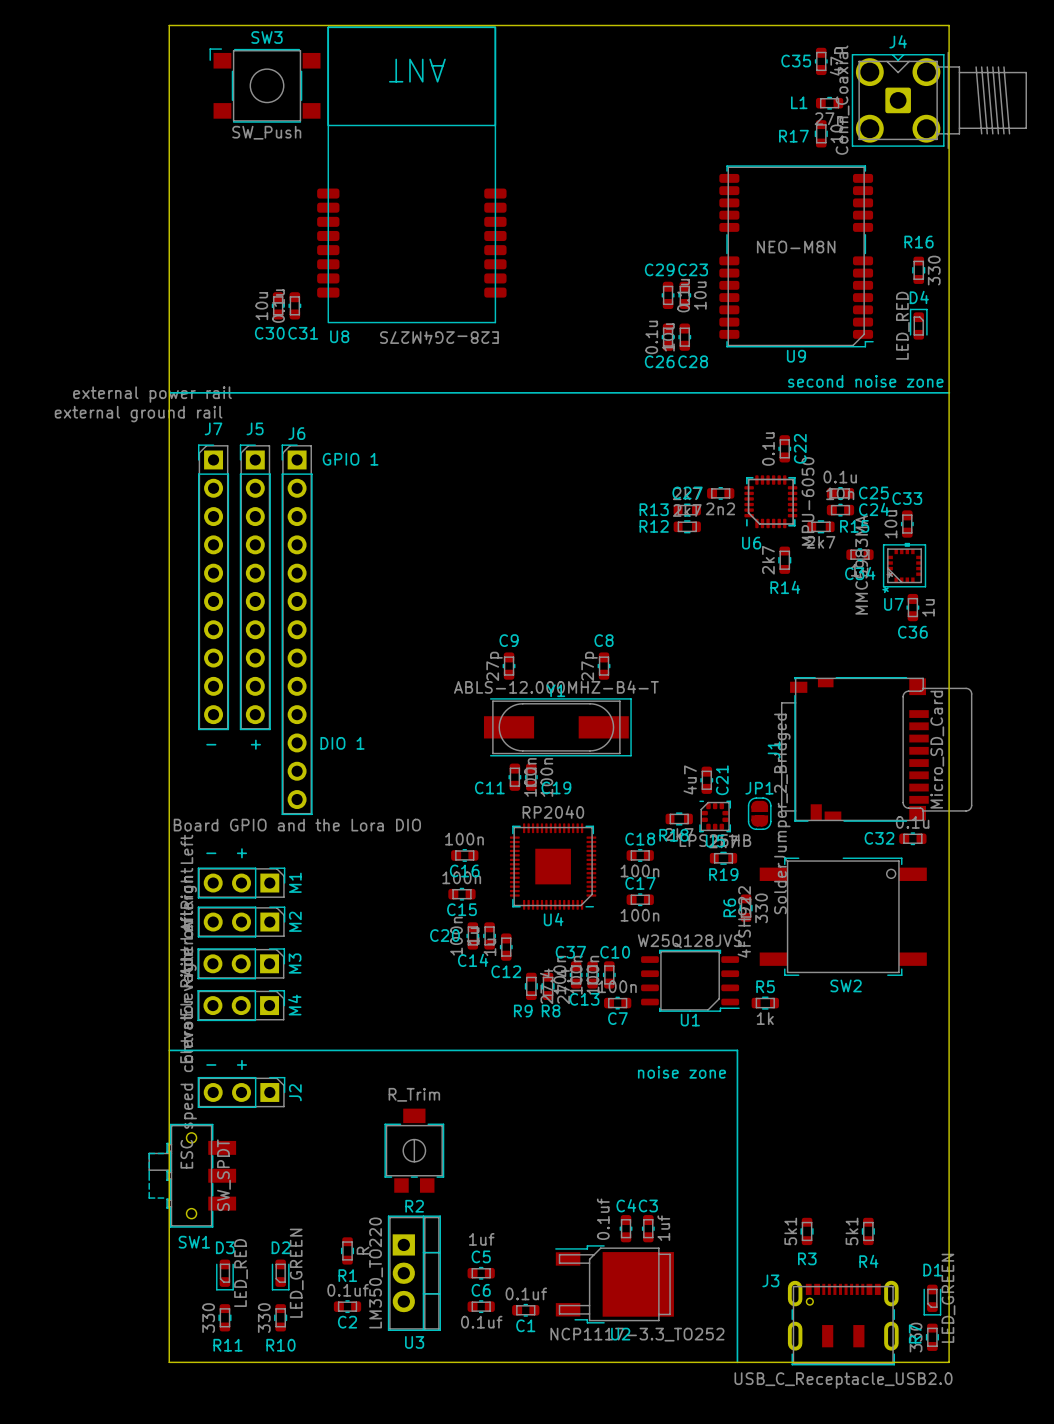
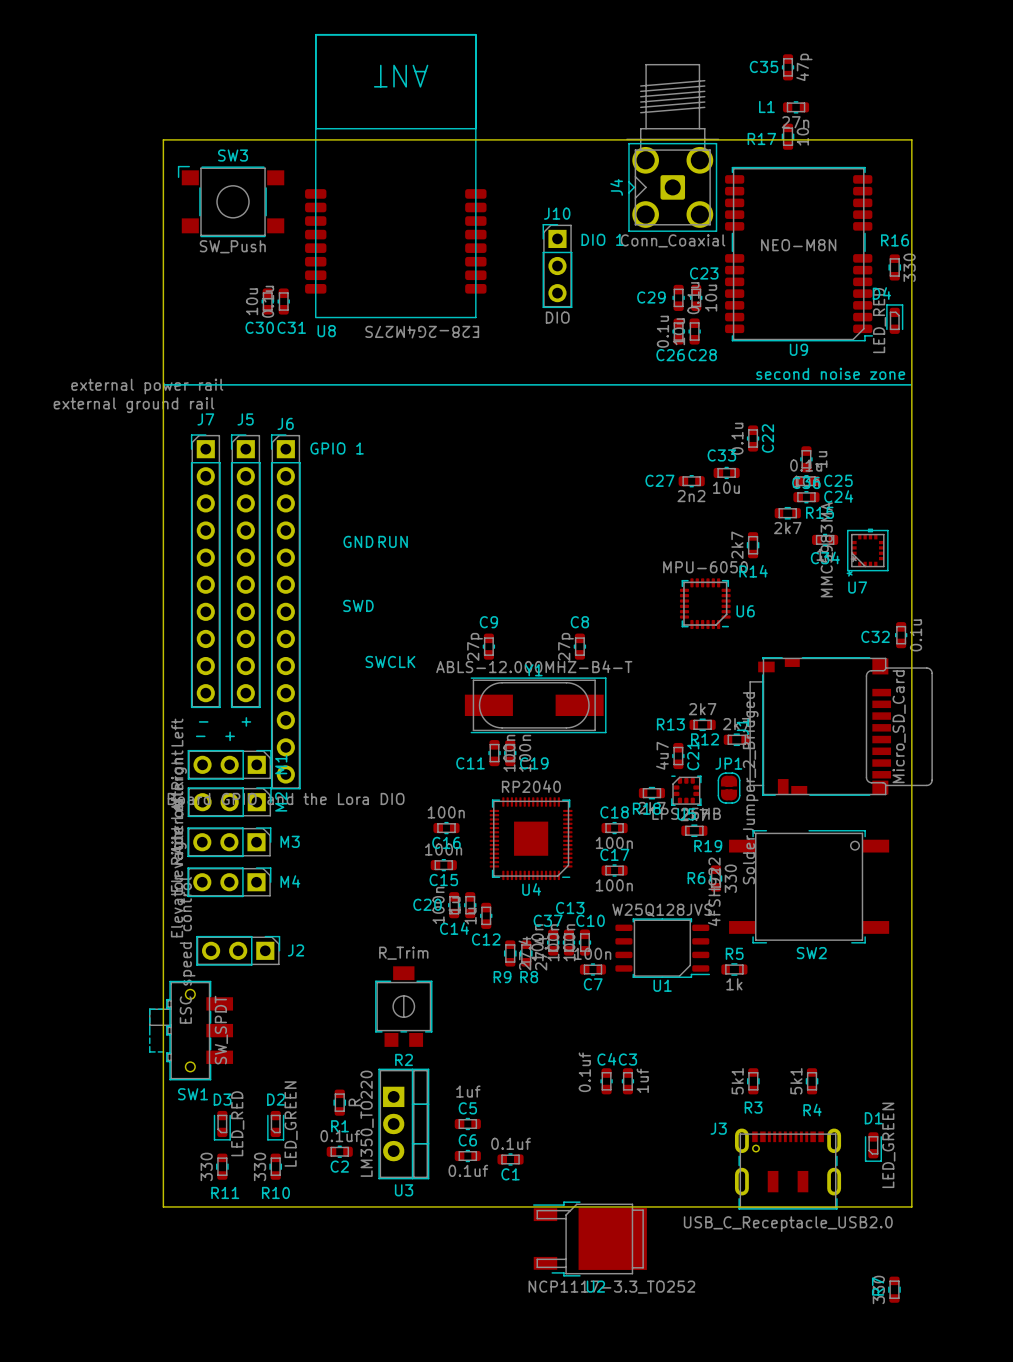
SW3 position: (265, 85) -> (231, 201)
J4 rotation: 0° (939, 100) -> 90° counterclockwise (672, 147)
J4 position: (939, 100) -> (672, 147)
board edge: (169, 137) (169, 25) (949, 25) (949, 1362) (169, 1362) (169, 1250) -> (163, 139) (911, 139) (911, 1206) (163, 1206)
text: none -> DIO 1 (602, 239)
U9 position: (796, 256) -> (799, 254)
J10: none -> DIO (557, 266)
C29 name position: C29 (659, 269) -> C29 (651, 297)
R16 position: (918, 270) -> (894, 267)
C29 position: (668, 295) -> (678, 297)
C23 position: (684, 295) -> (696, 297)
D4 position: (918, 324) -> (894, 319)
C26 position: (668, 337) -> (678, 331)
C28 position: (684, 337) -> (694, 331)
U6 rotation: 0° (770, 501) -> 90° counterclockwise (705, 603)
U6 position: (770, 501) -> (705, 603)
R13 position: (687, 510) -> (702, 724)
C33 value position: 10u (890, 524) -> 10u (726, 487)
C33 rotation: 0° (907, 524) -> 90° clockwise (726, 472)
C33 position: (907, 524) -> (726, 472)
R12 position: (687, 526) -> (736, 739)
text: none -> GND (358, 541)
text: none -> RUN (393, 541)
C36 position: (912, 607) -> (806, 459)
text: none -> SWD (358, 605)
text: none -> SWCLK (390, 661)
text: DIO 1 (342, 743) -> none
C32 rotation: 0° (912, 838) -> 90° clockwise (901, 635)
C32 position: (912, 838) -> (901, 635)
text position: - (211, 853) -> - (200, 736)
text position: + (241, 853) -> + (230, 736)
R19 name position: R19 (723, 874) -> R19 (708, 846)
M1 position: (241, 883) -> (229, 764)
R6 name rotation: 0° (729, 907) -> 90° clockwise (696, 878)
M2 position: (241, 922) -> (229, 802)
M3 position: (241, 963) -> (229, 842)
M3 name rotation: 0° (295, 963) -> 90° clockwise (290, 841)
C13 name position: C13 (584, 999) -> C13 (570, 907)
M4 position: (241, 1005) -> (229, 882)
M4 name rotation: 0° (294, 1005) -> 90° clockwise (290, 881)
line: (169, 1050) (737, 1050) (737, 1362) -> none
text: - (211, 1064) -> none
text: + (241, 1064) -> none
text: noise zone (681, 1072) -> none
J2 position: (241, 1092) -> (238, 950)
J2 name rotation: 0° (295, 1092) -> 90° clockwise (296, 950)
R2 position: (414, 1150) -> (403, 1006)
SW1 position: (192, 1175) -> (191, 1030)
C4 position: (626, 1228) -> (606, 1081)
C3 position: (648, 1228) -> (627, 1081)
R3 position: (807, 1231) -> (753, 1081)
R4 position: (868, 1231) -> (812, 1081)
R1 position: (347, 1250) -> (339, 1102)
U3 position: (414, 1273) -> (403, 1123)
C5 position: (481, 1273) -> (467, 1123)
D3 position: (224, 1275) -> (222, 1125)
D2 position: (280, 1275) -> (275, 1125)
D1 position: (932, 1300) -> (873, 1147)
C2 position: (347, 1306) -> (339, 1151)
C6 position: (481, 1306) -> (467, 1156)
C1 position: (525, 1310) -> (510, 1159)
R11 position: (224, 1317) -> (222, 1166)
R10 position: (280, 1317) -> (275, 1166)
J3 position: (843, 1323) -> (788, 1169)

